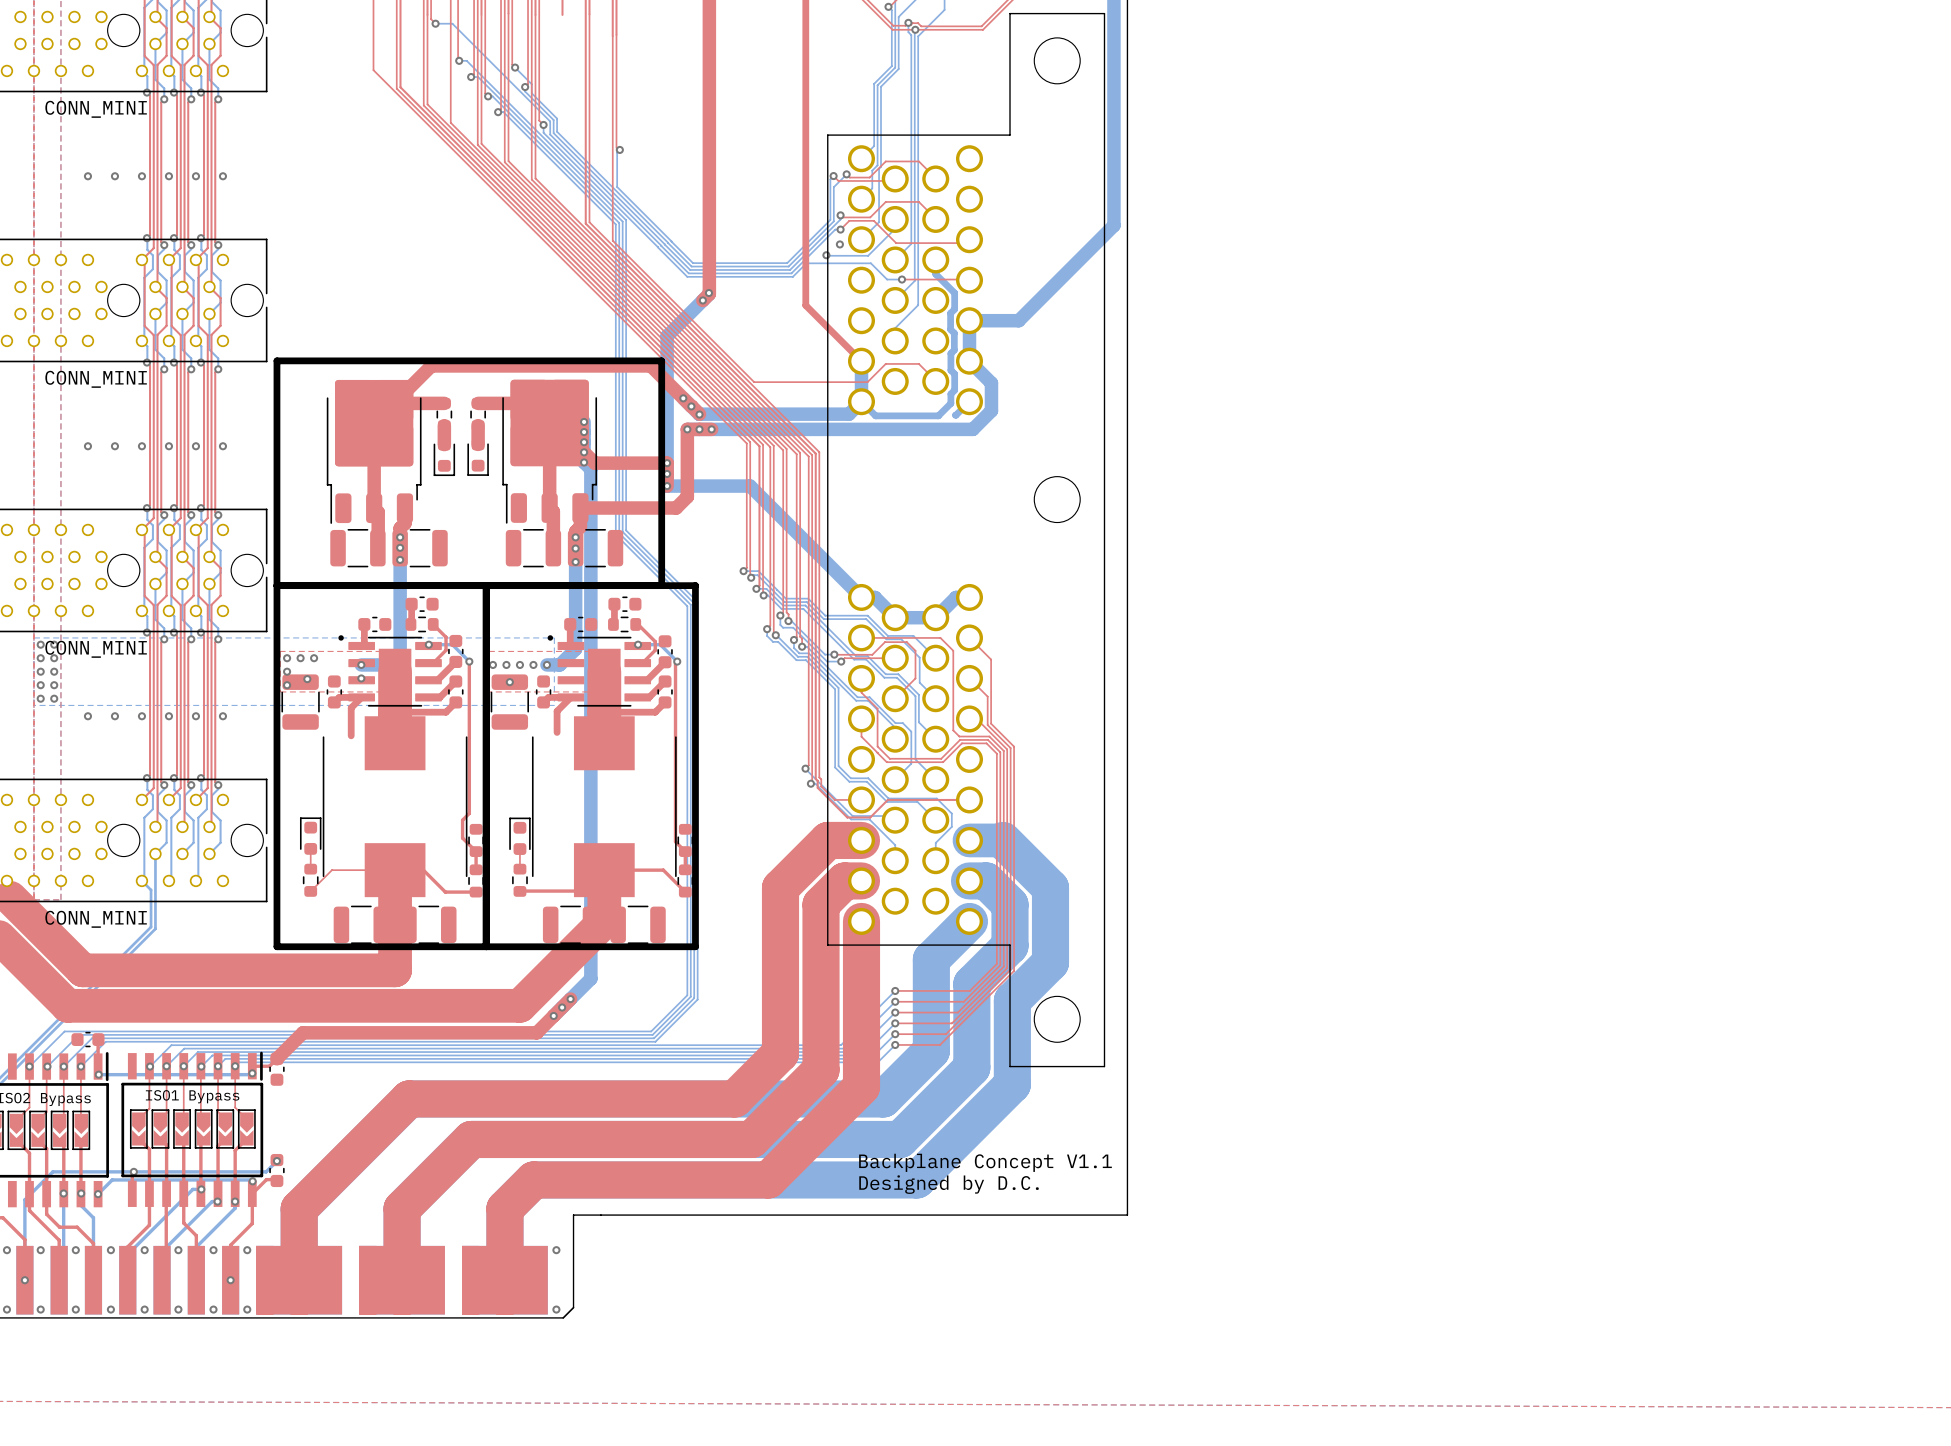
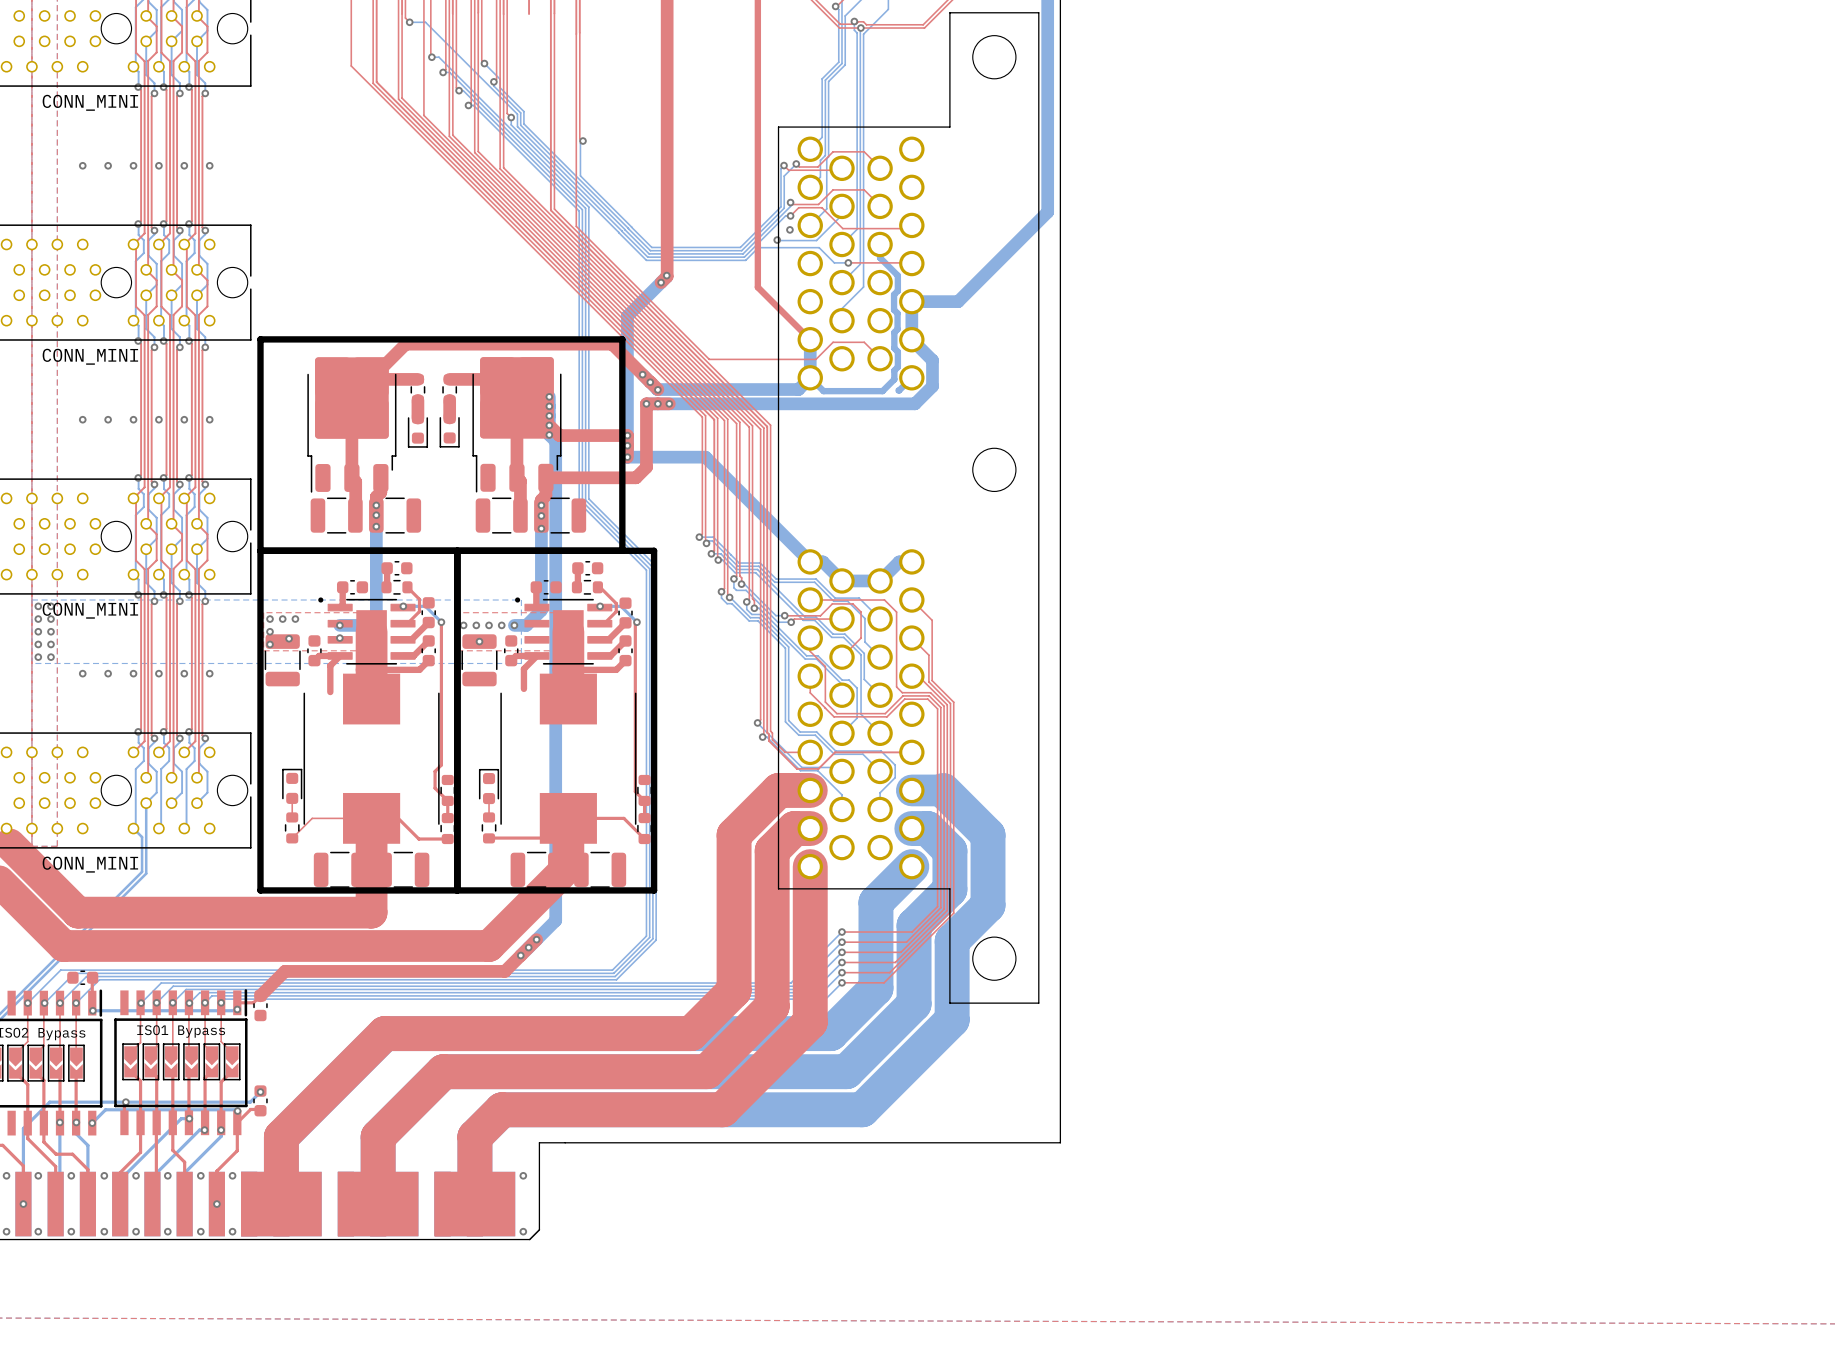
text: Backplane Concept V1.1 (985, 1162) -> none
text: Designed by D.C. (949, 1184) -> none

